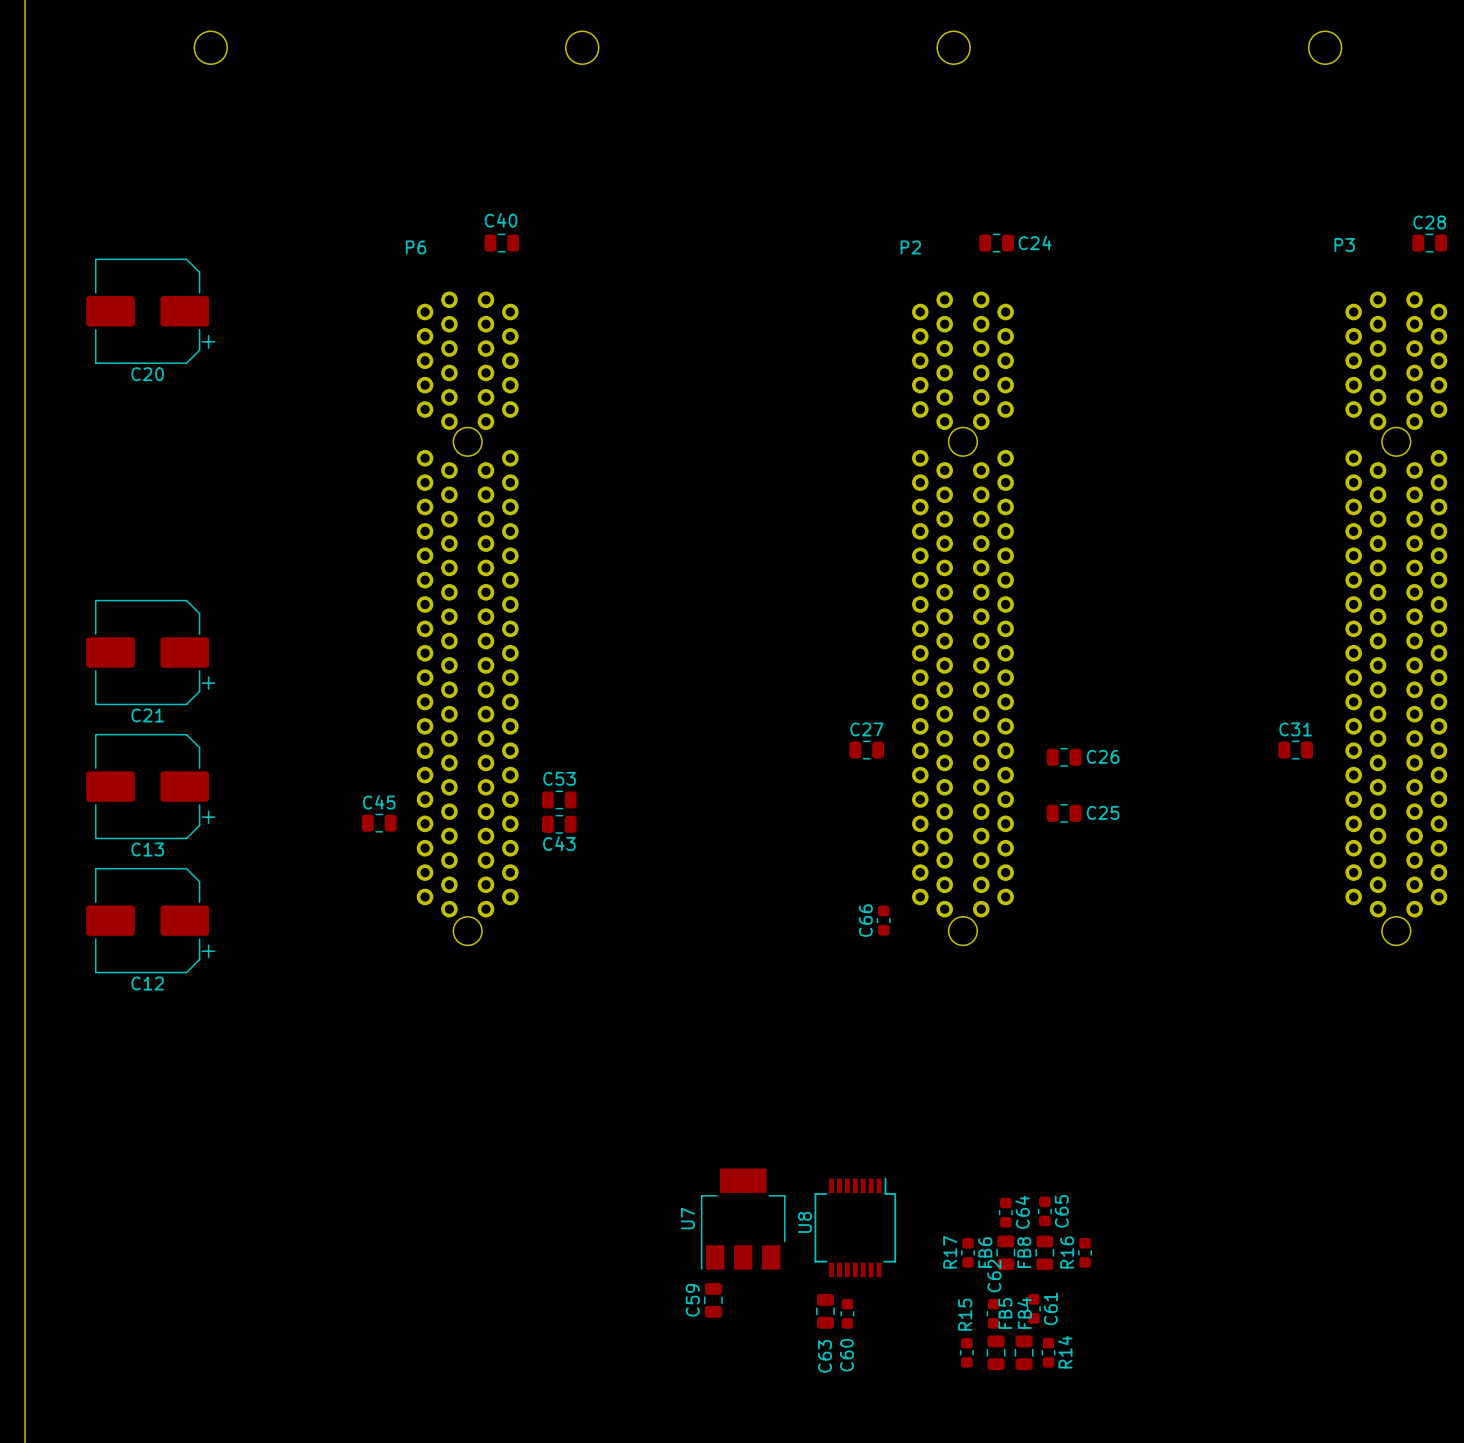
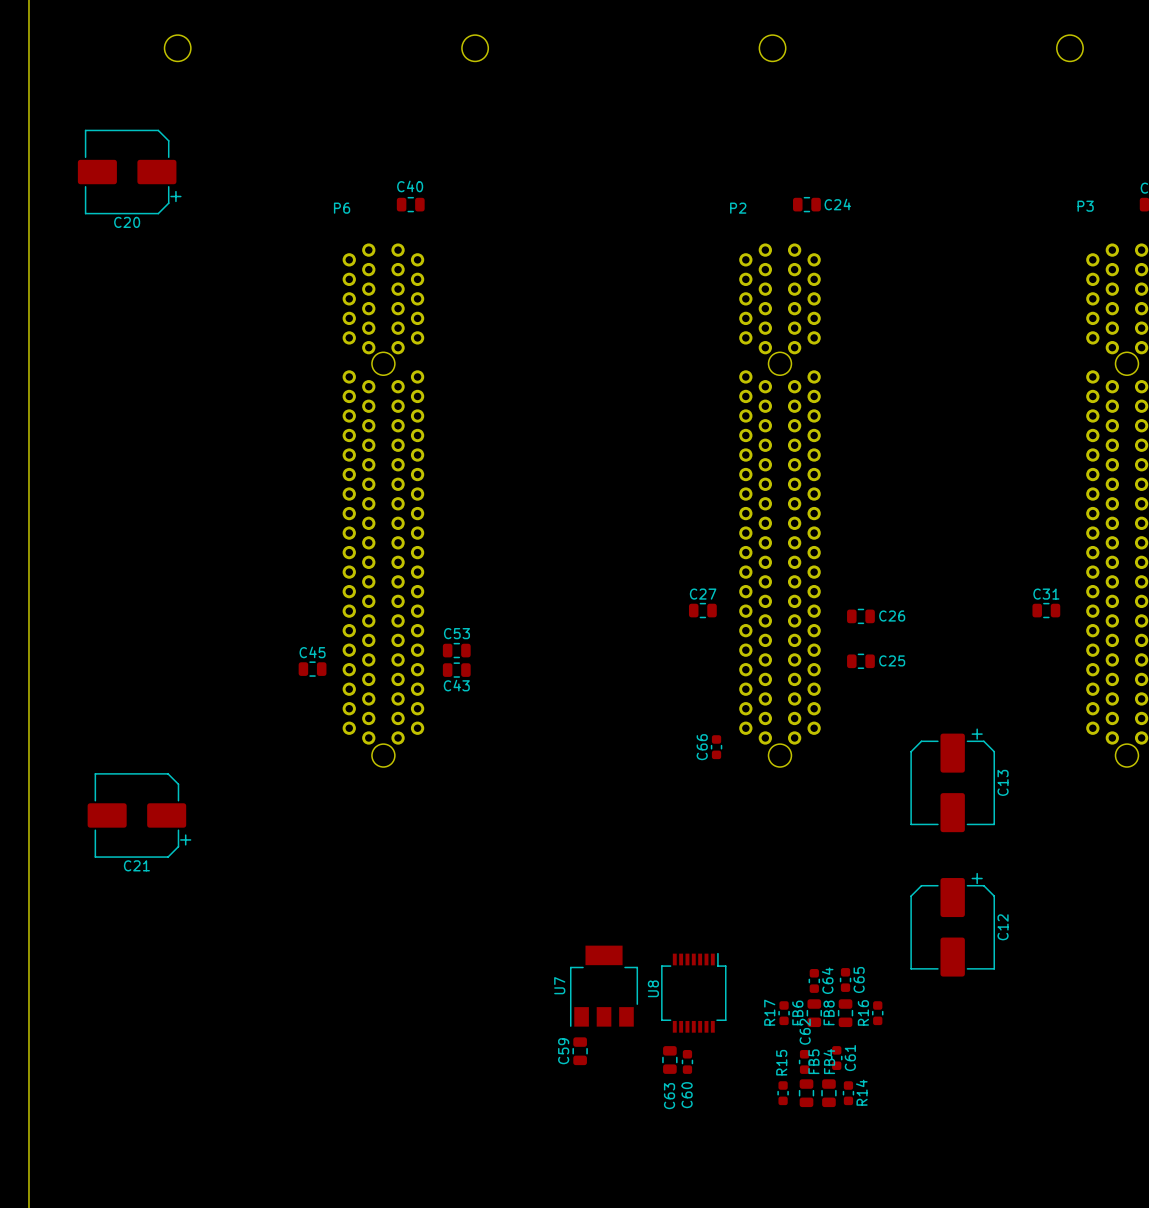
C20 position: (150, 311) -> (129, 172)
C21 position: (150, 652) -> (139, 815)
C13 rotation: 0° (150, 786) -> 90° counterclockwise (952, 780)
C13 position: (150, 786) -> (952, 780)
C12 rotation: 0° (150, 920) -> 90° counterclockwise (952, 924)
C12 position: (150, 920) -> (952, 924)

